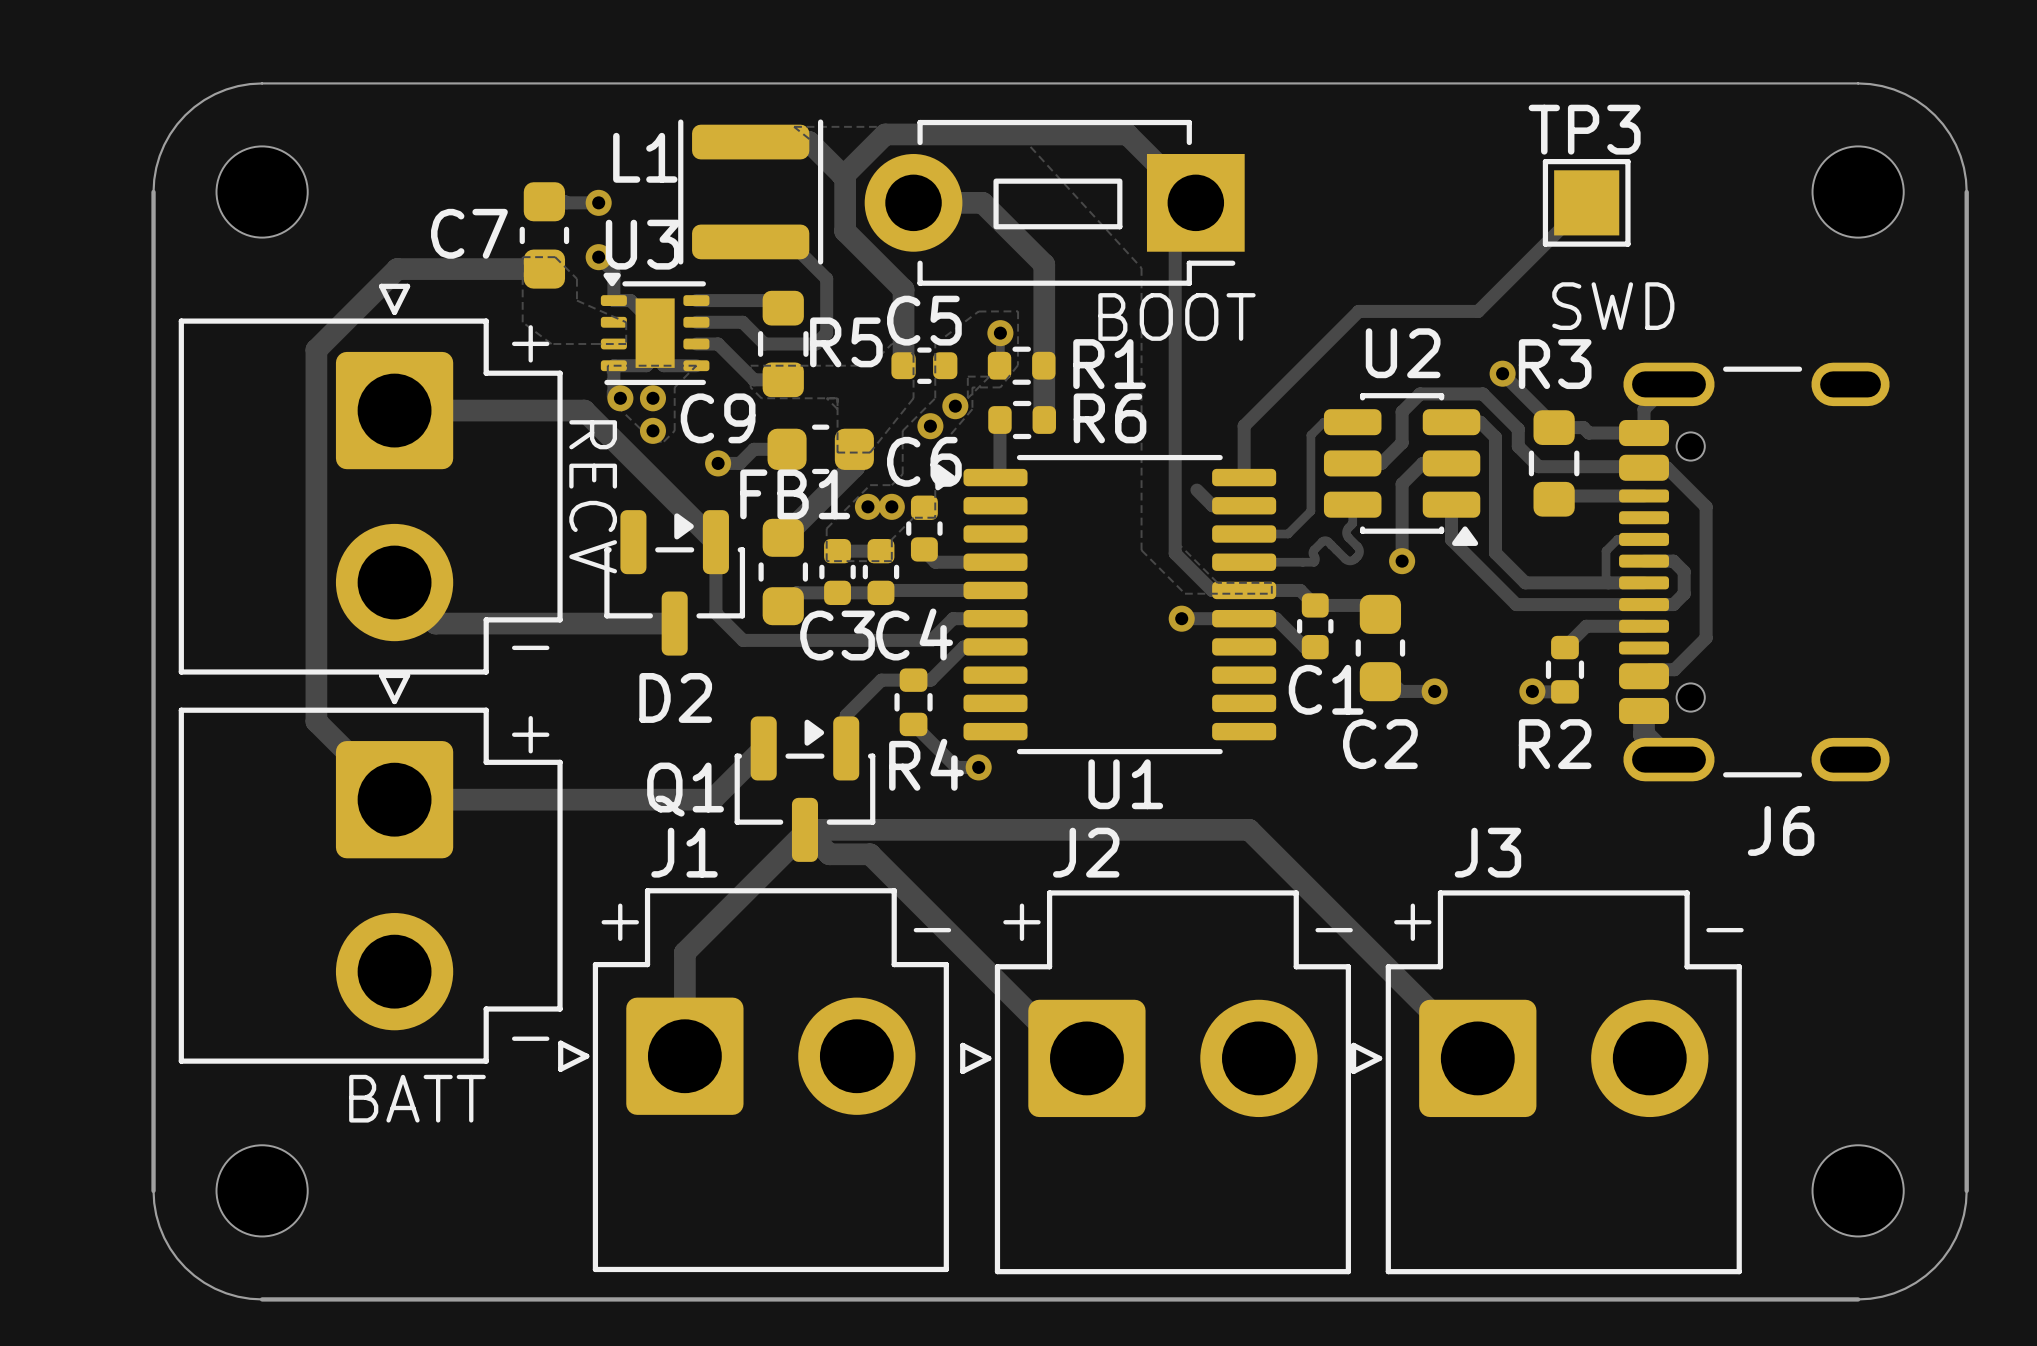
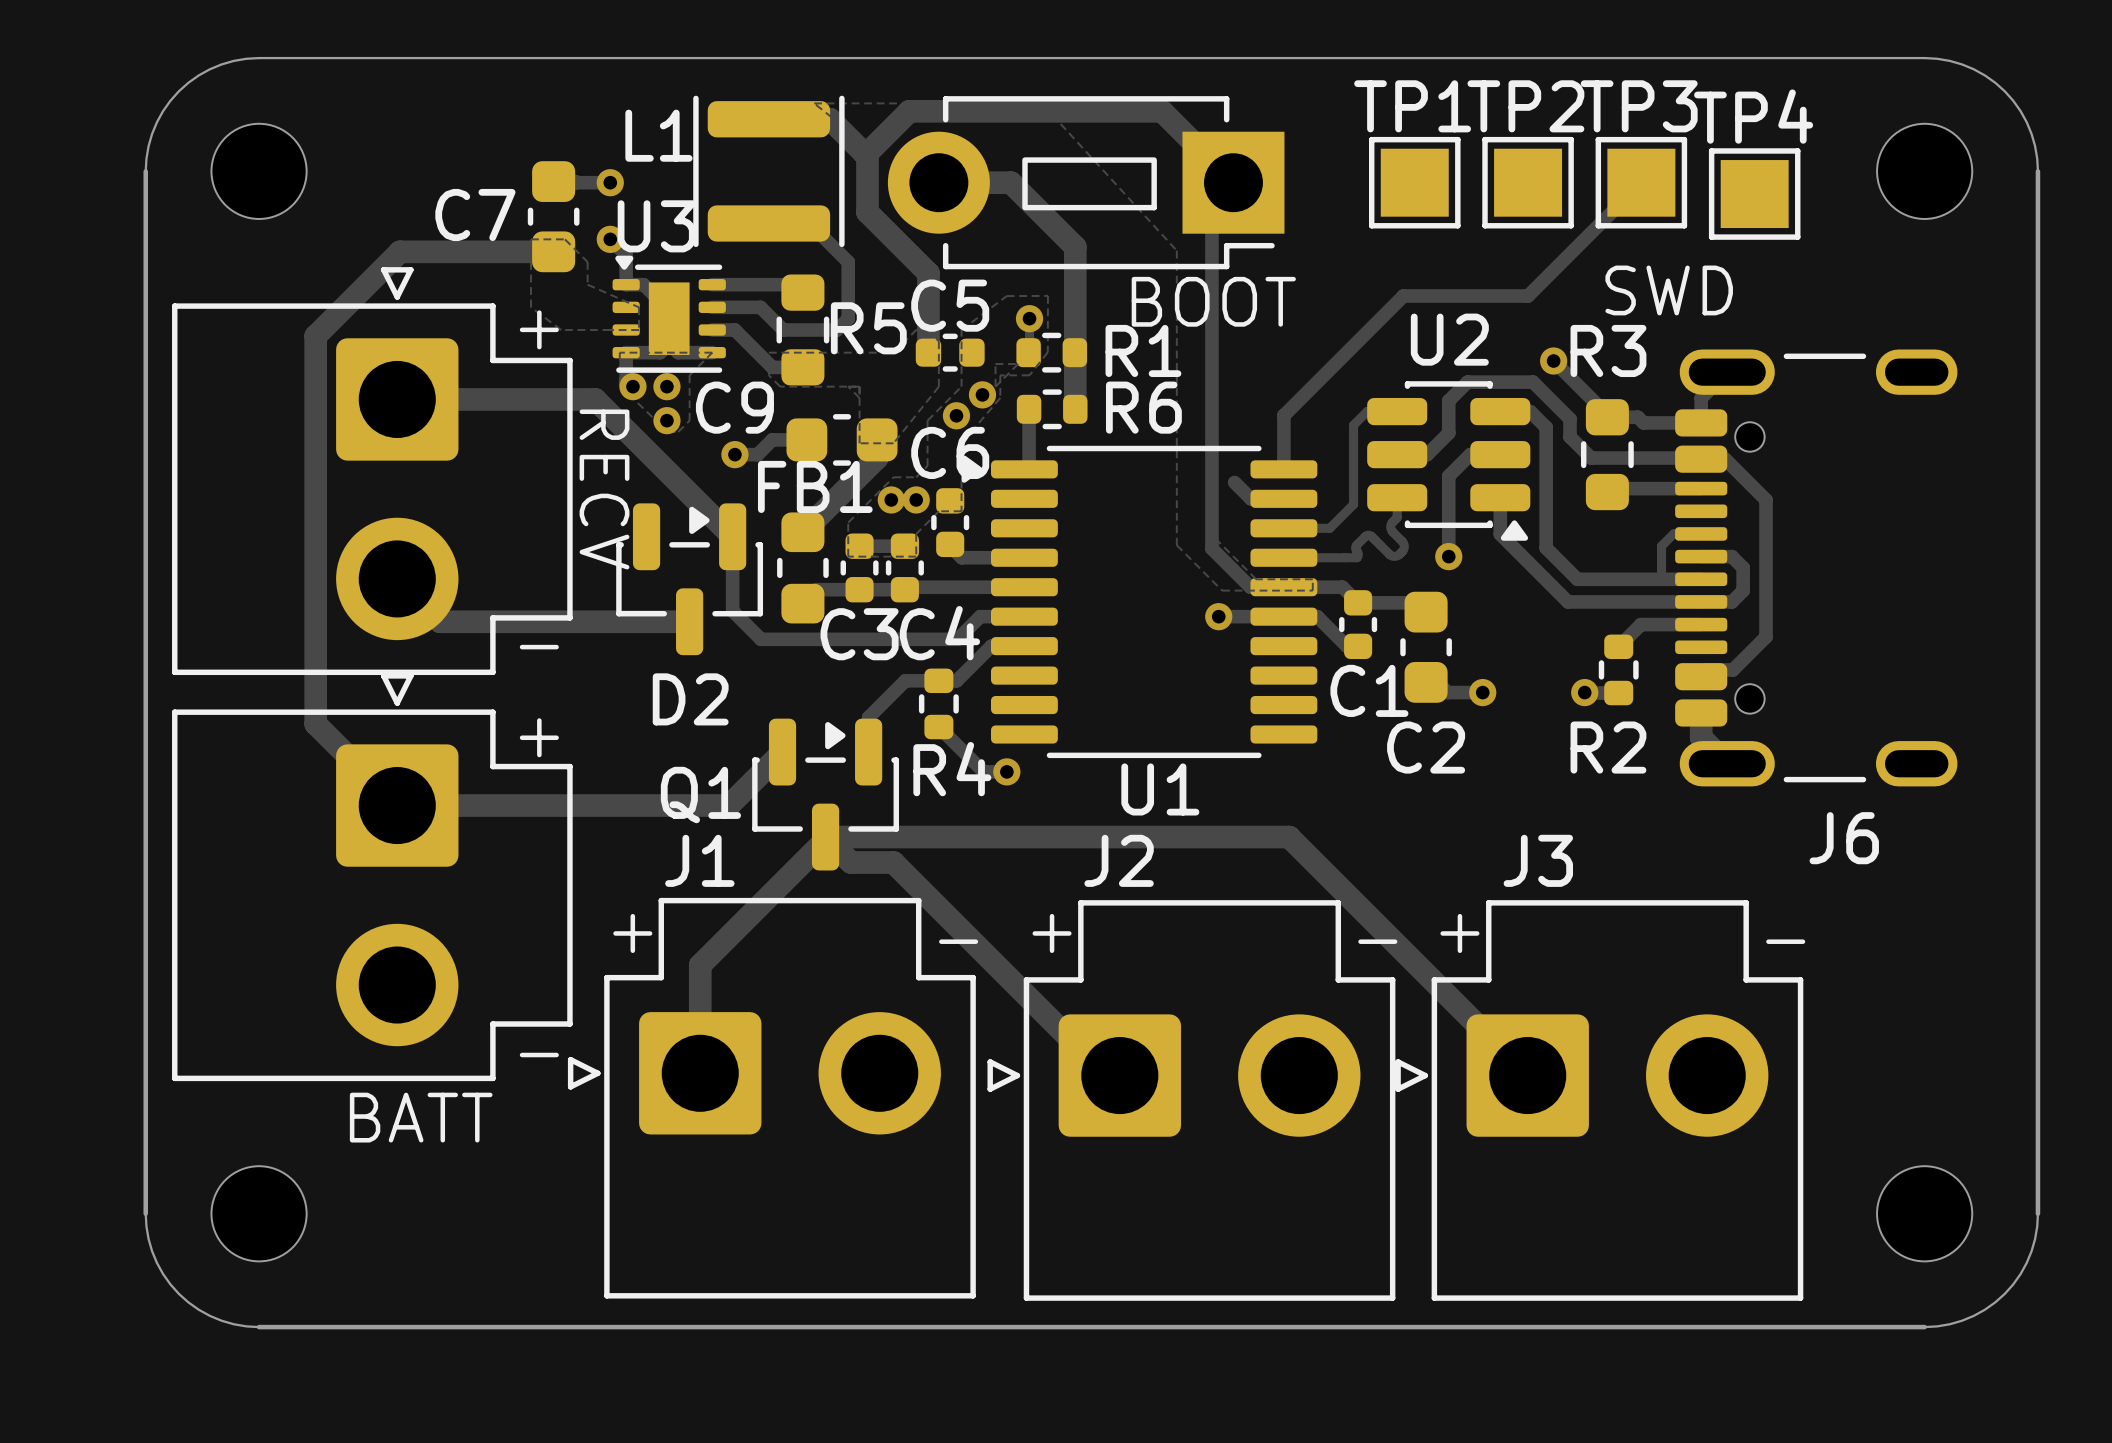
TP1: none -> (1414, 182)
TP2: none -> (1528, 182)
TP4: none -> (1754, 194)

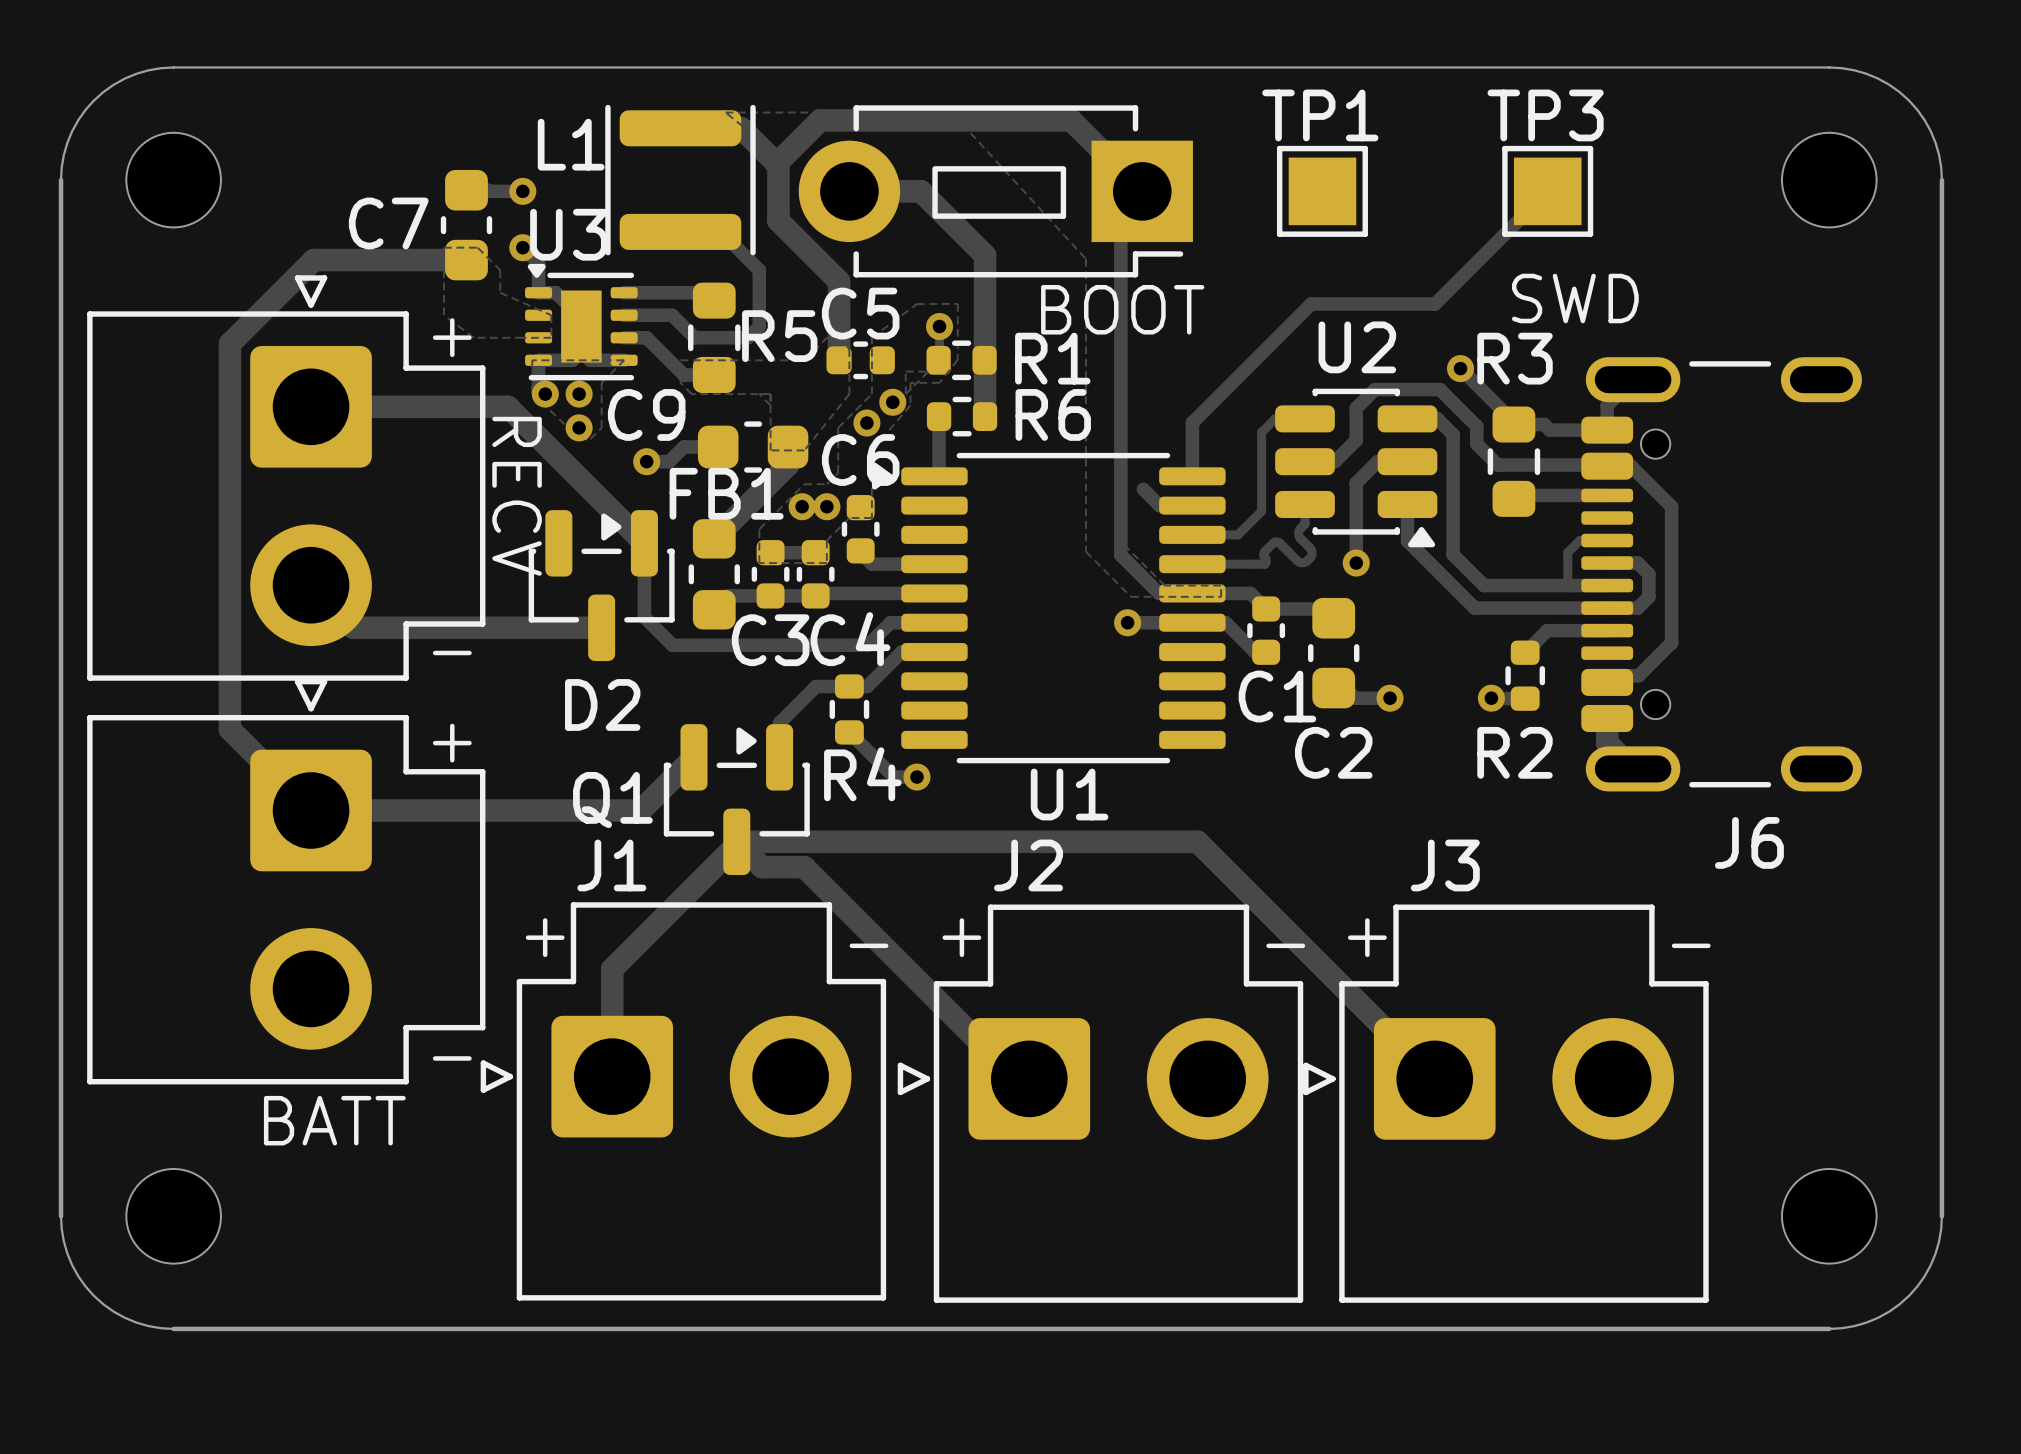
TP2: (1528, 182) -> none
TP4: (1754, 194) -> none

